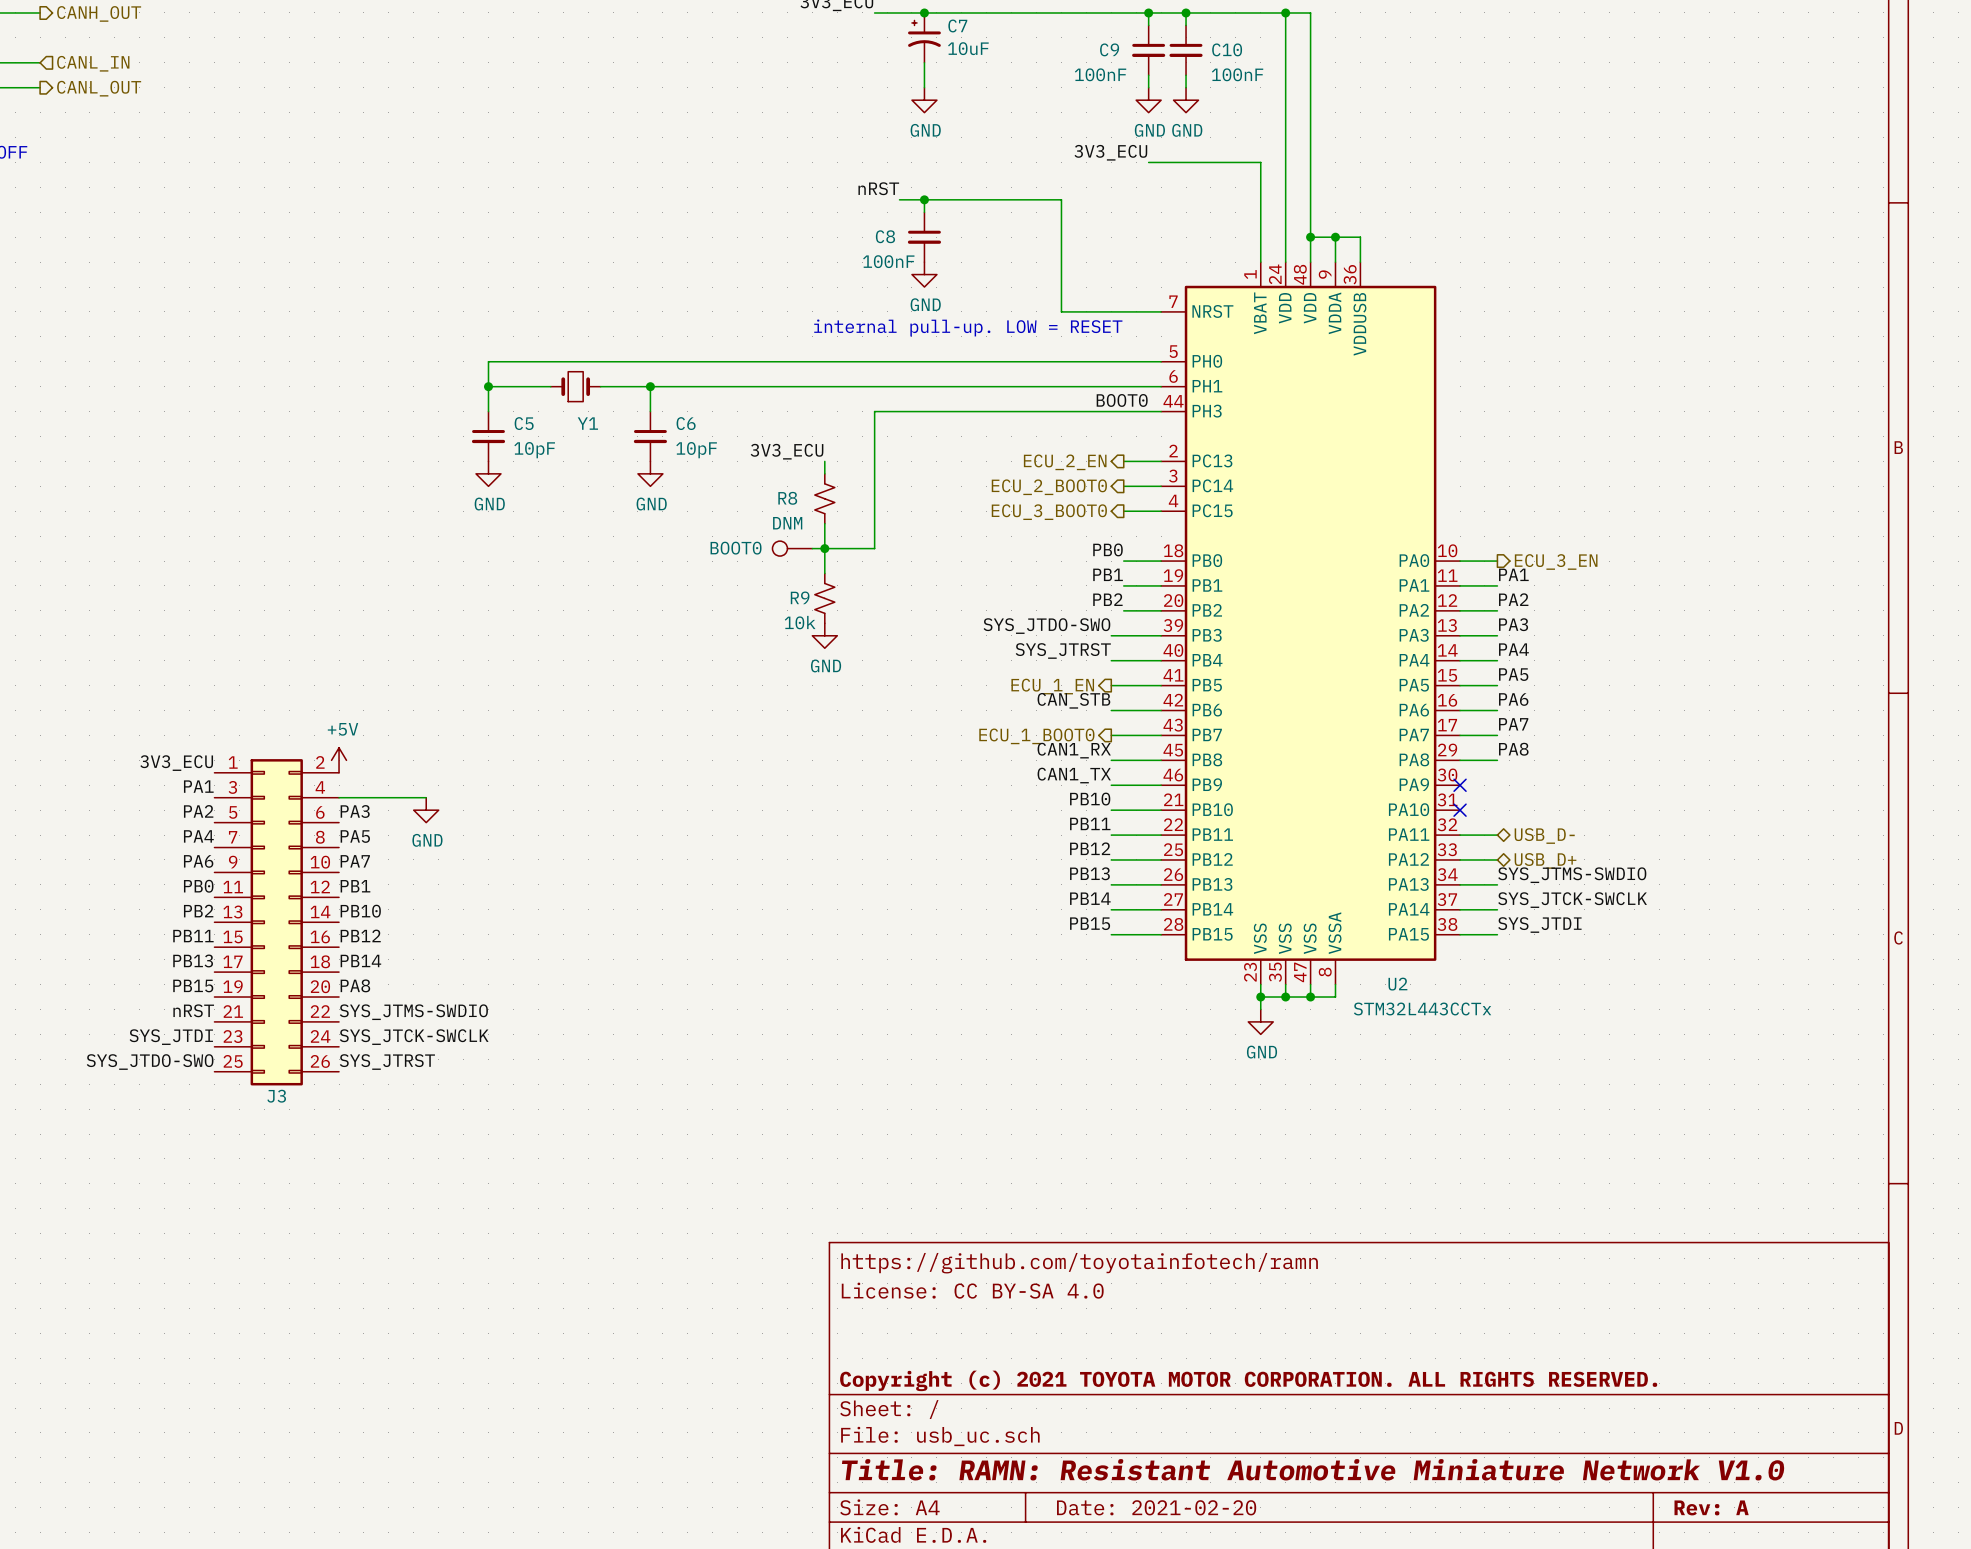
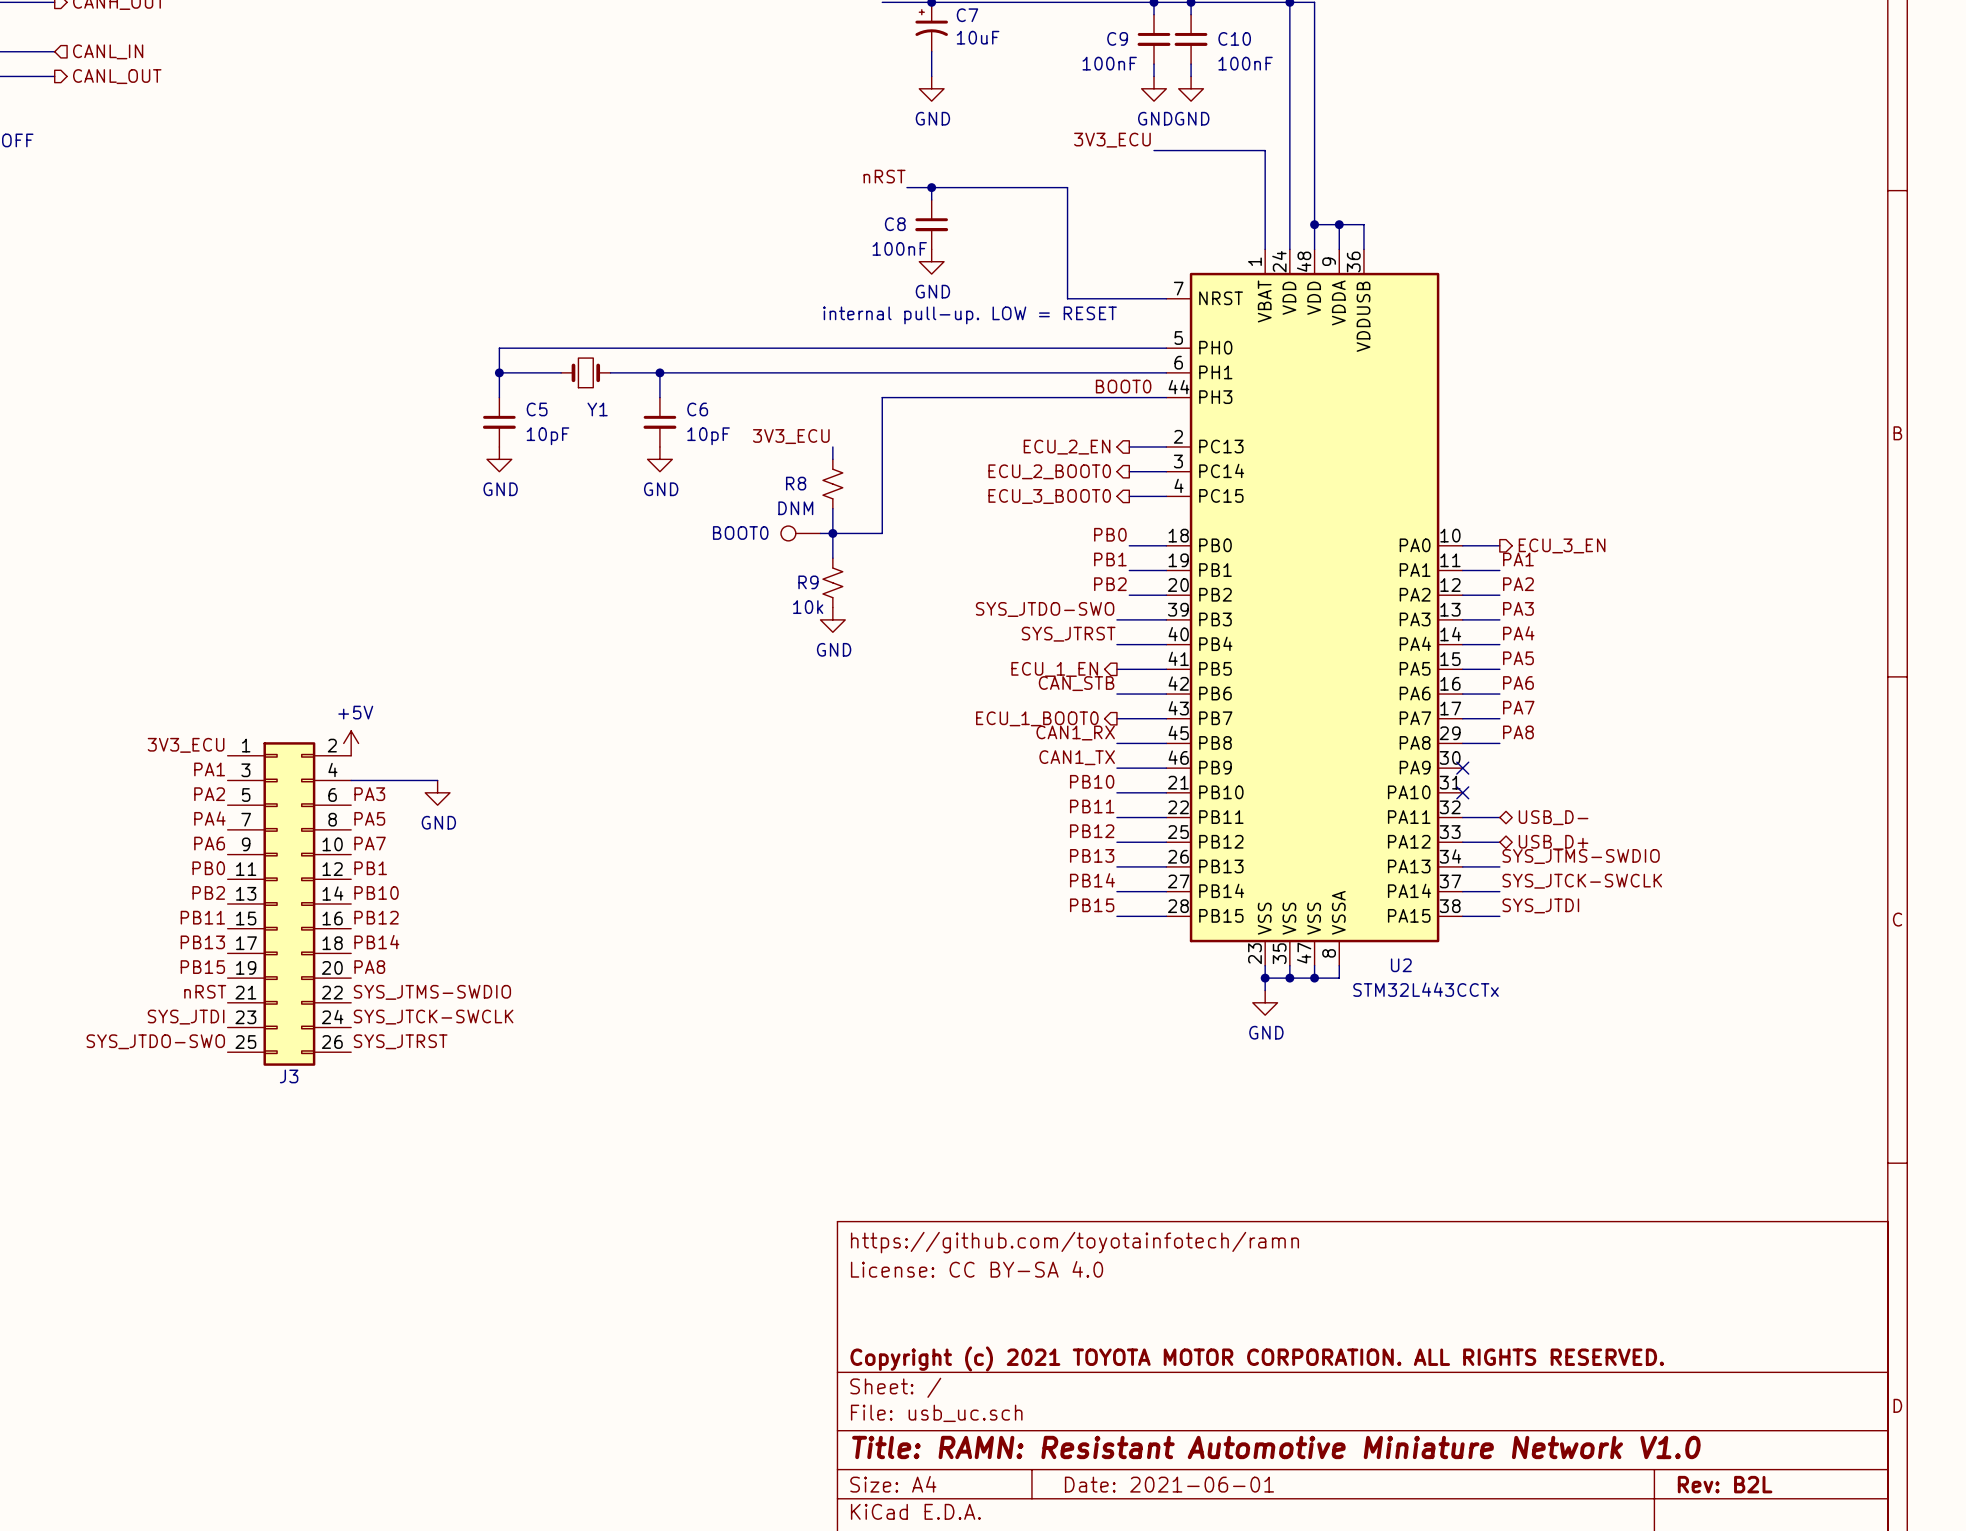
title block: Date: 2021-02-20 (1156, 1507) -> Date: 2021-06-01 (1169, 1484)
title block: Rev: A (1711, 1507) -> Rev: B2L (1725, 1484)

